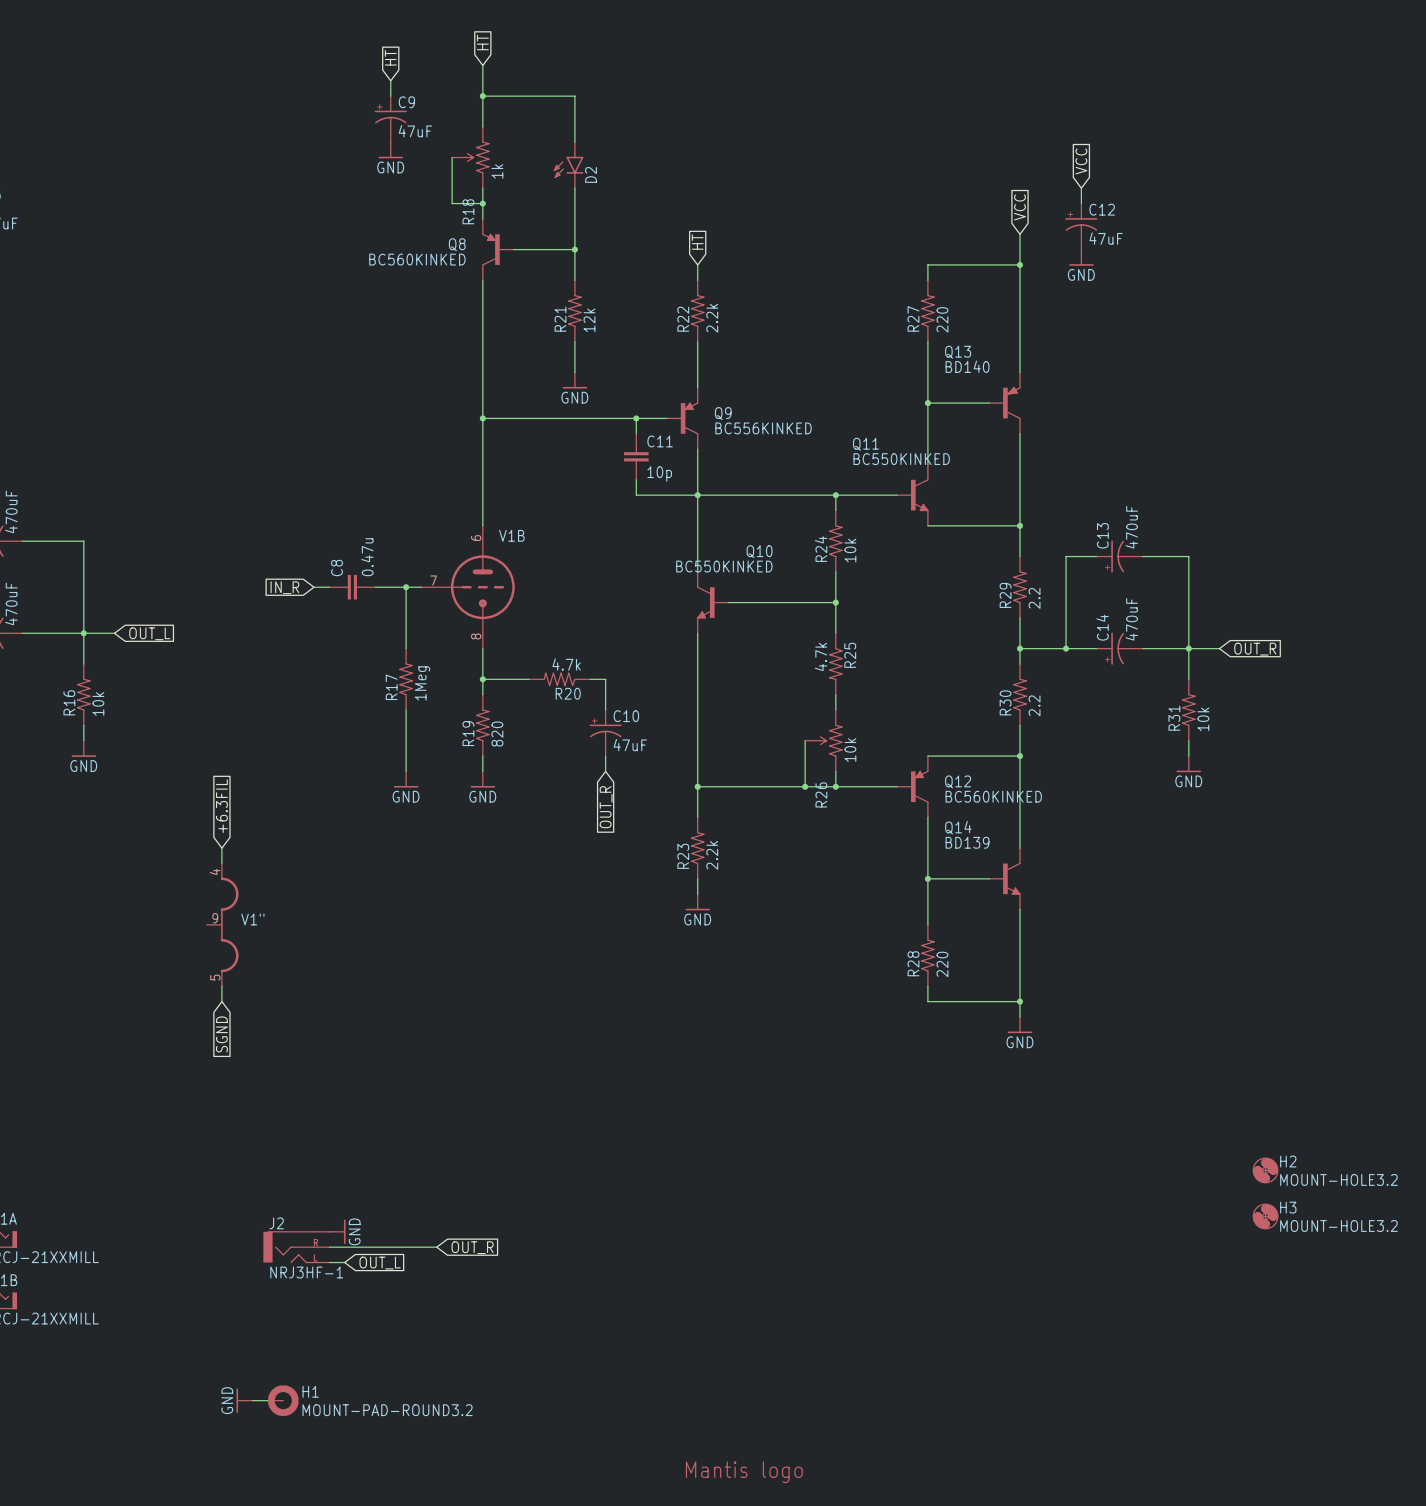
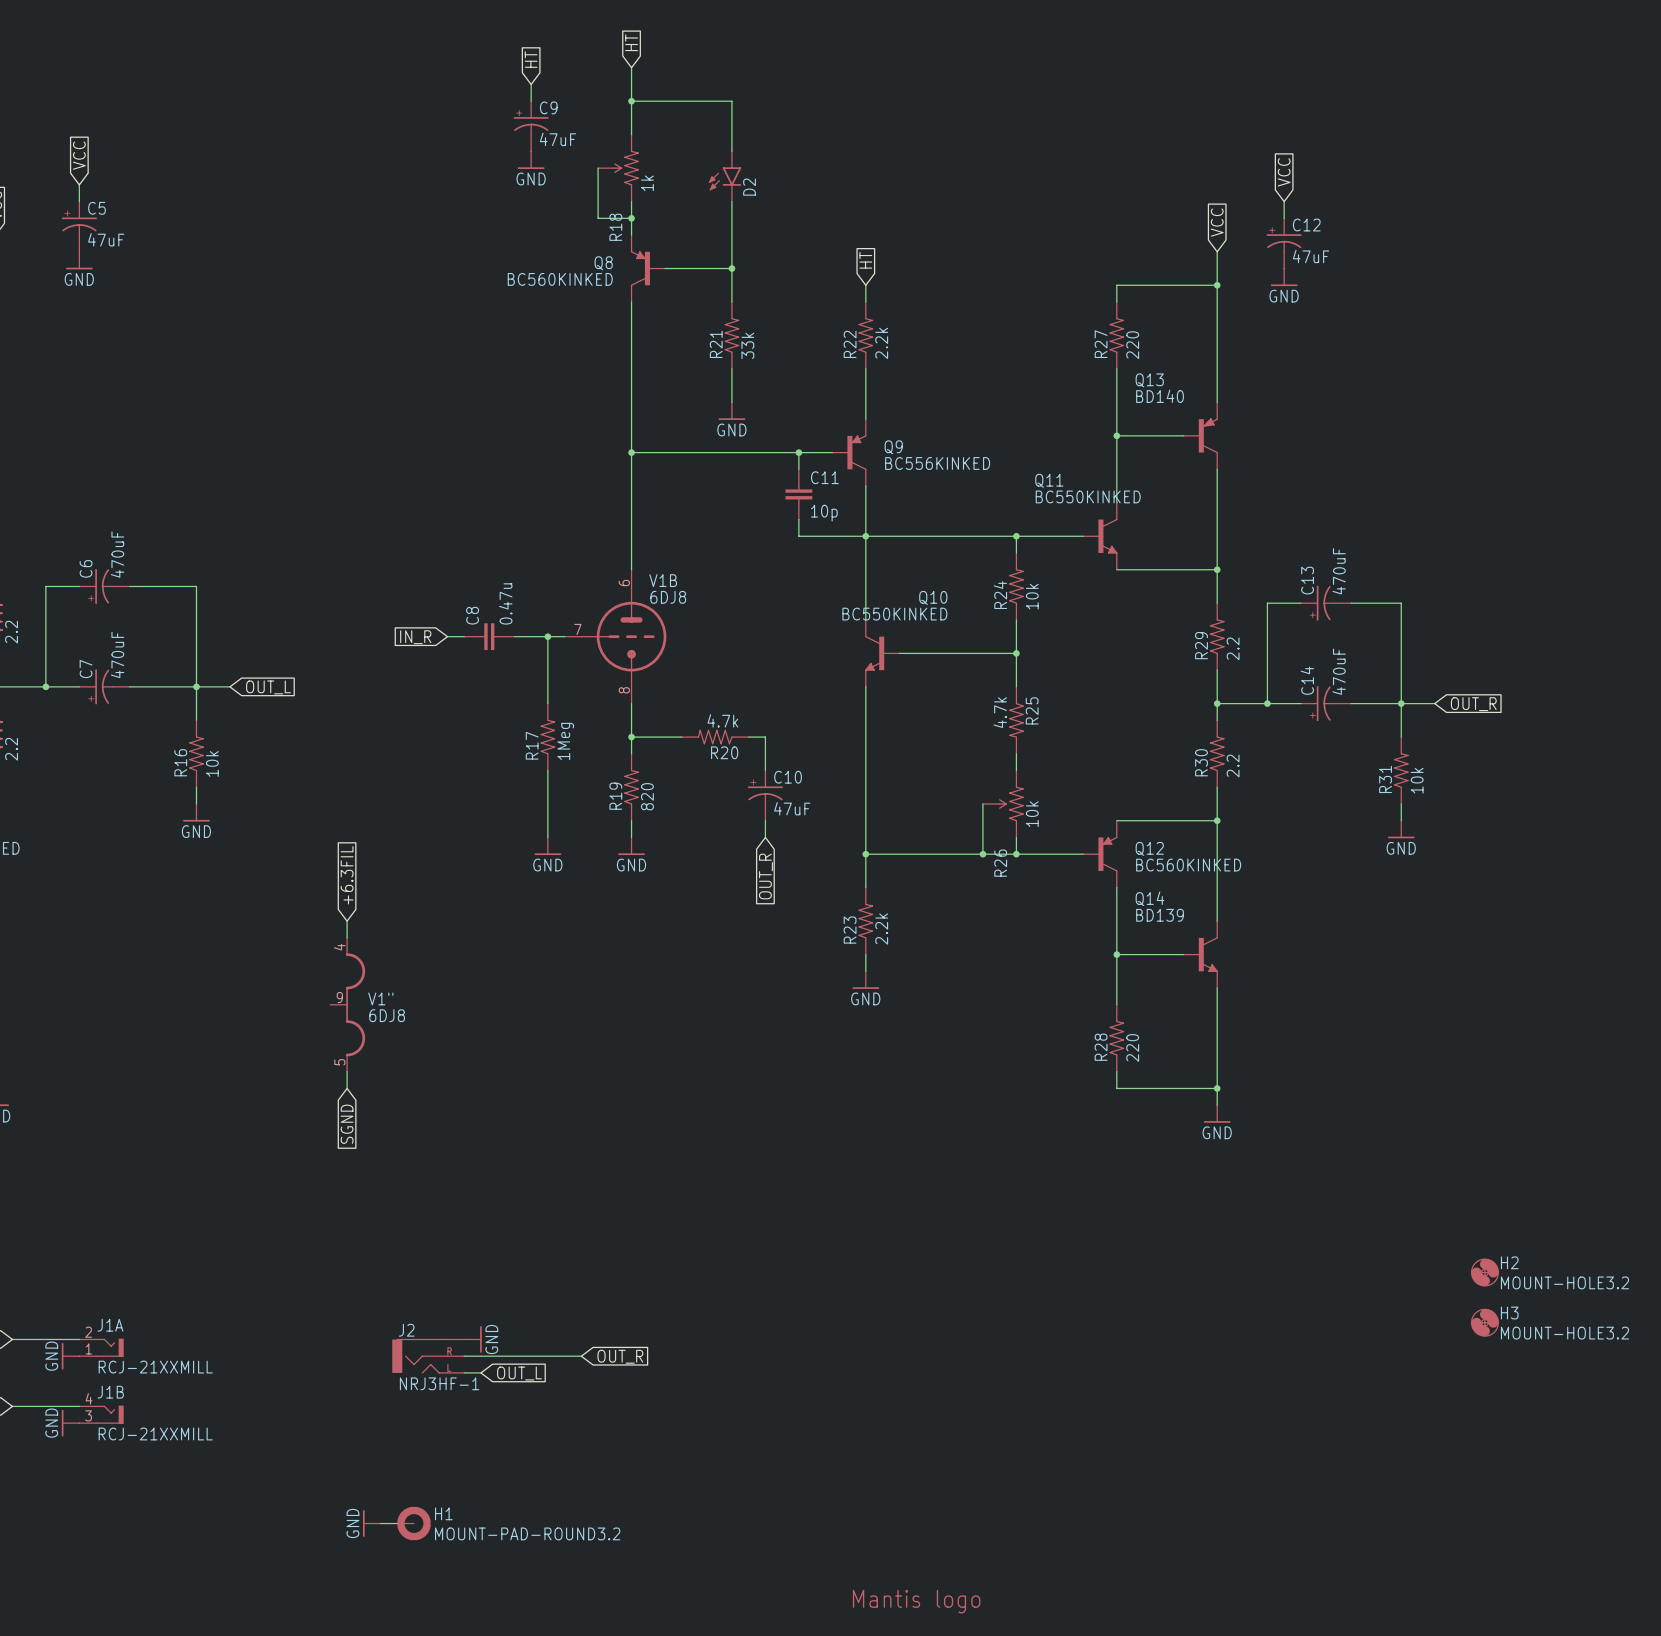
R21 value: 12k (589, 320) -> 33k (747, 345)
V1B value: none -> 6DJ8 (668, 597)
V1" value: none -> 6DJ8 (387, 1015)

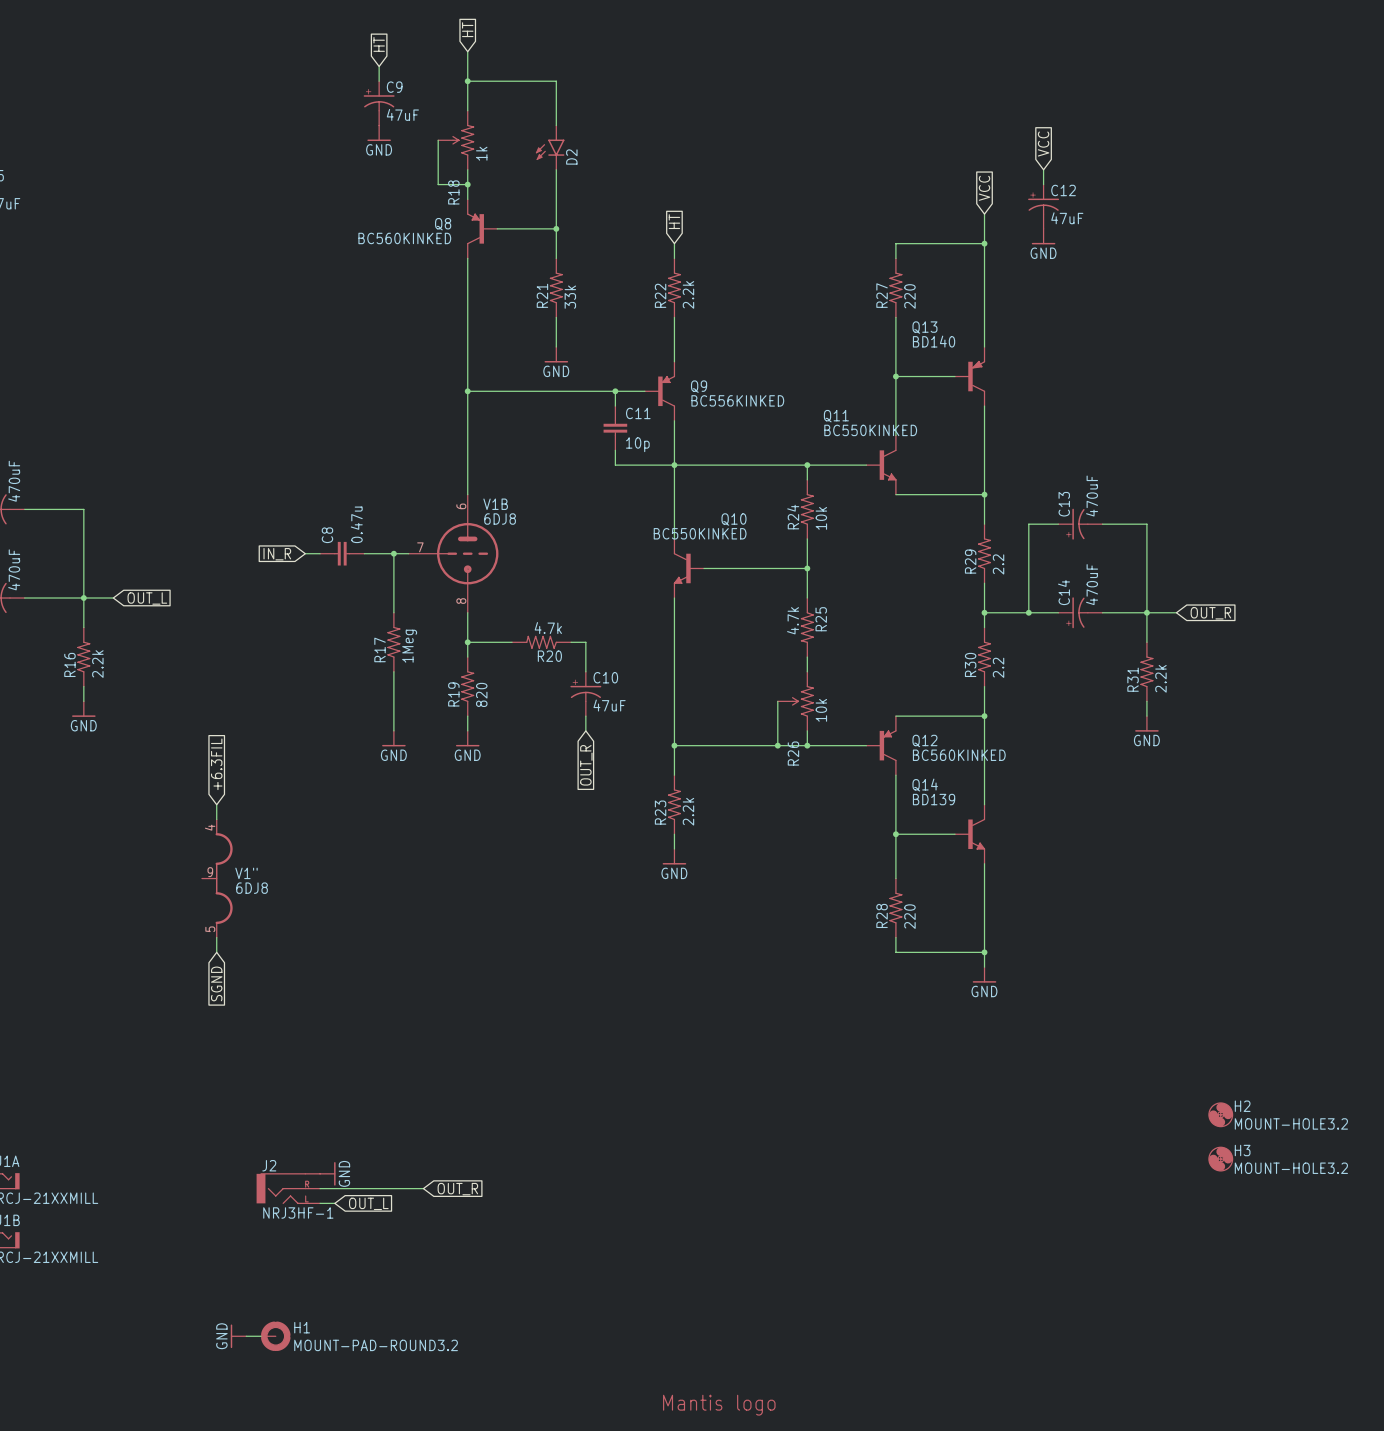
R16 value: 10k (212, 763) -> 2.2k (97, 664)
R31 value: 10k (1417, 780) -> 2.2k (1160, 678)

